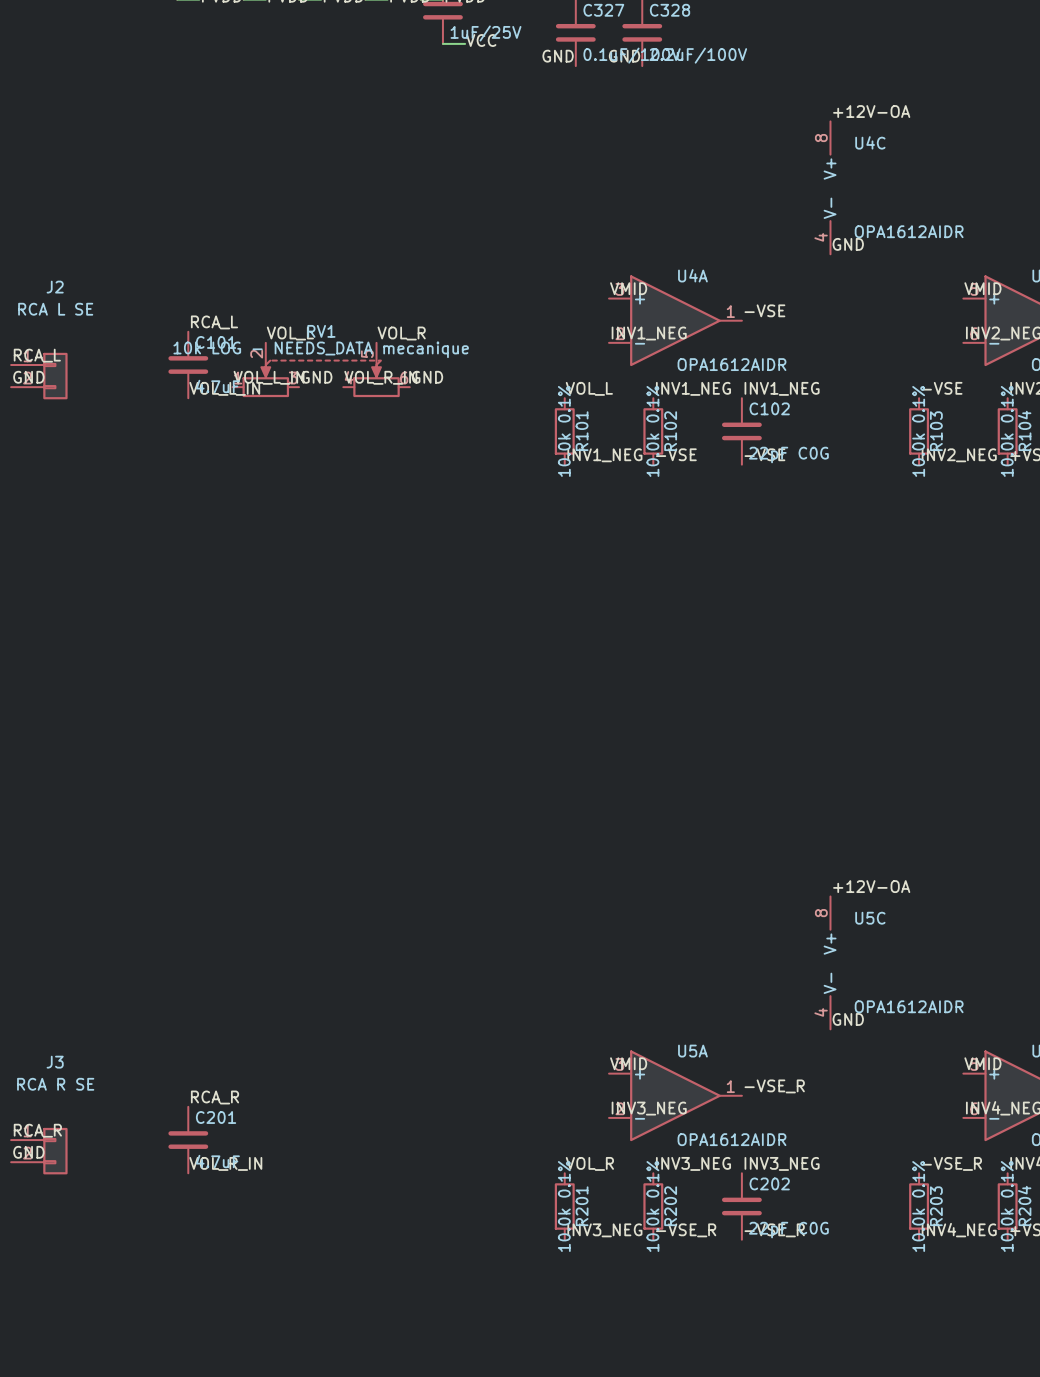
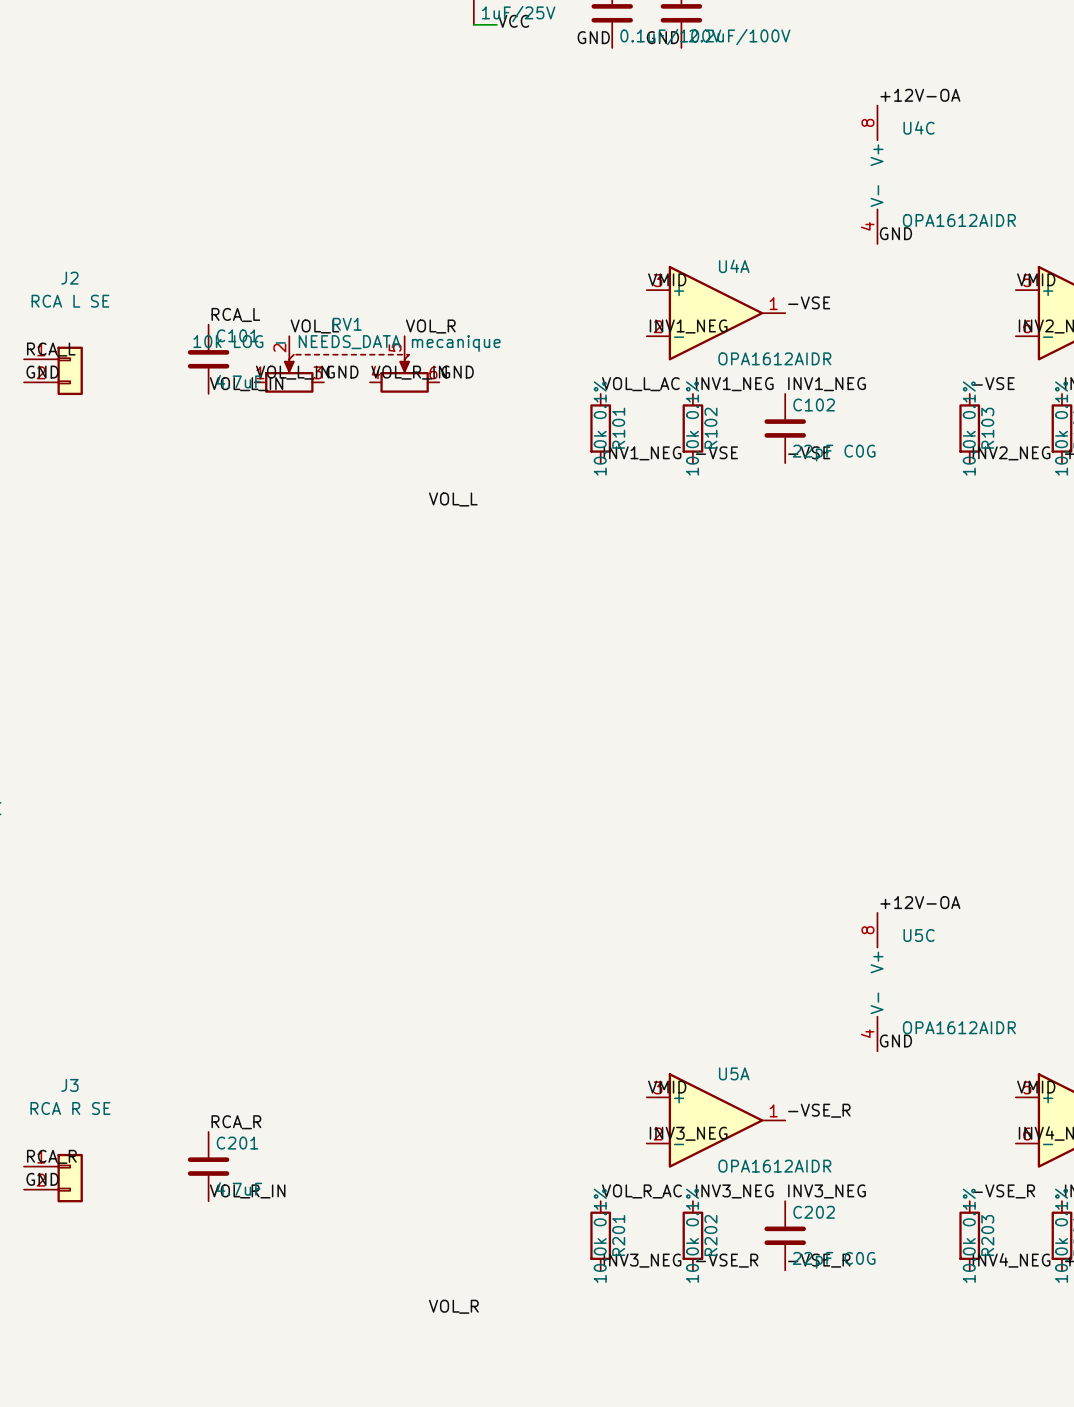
label: VOL_L (589, 388) -> VOL_L_AC (640, 384)
label: none -> VOL_L (453, 499)
label: VOL_R (589, 1163) -> VOL_R_AC (641, 1191)
label: none -> VOL_R (453, 1306)

